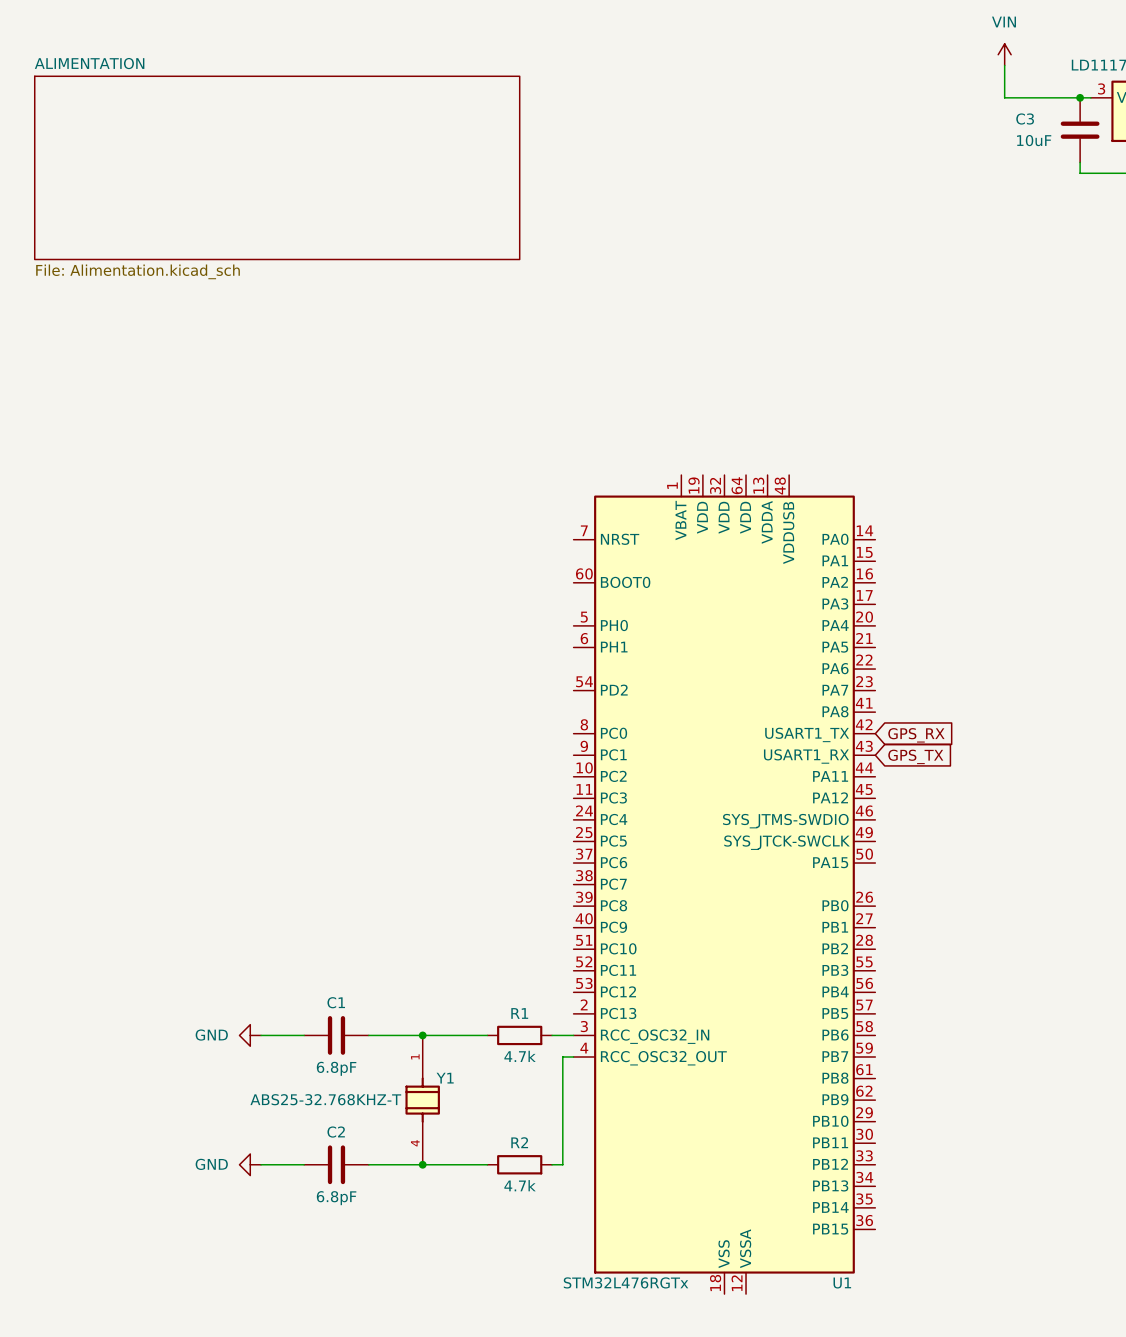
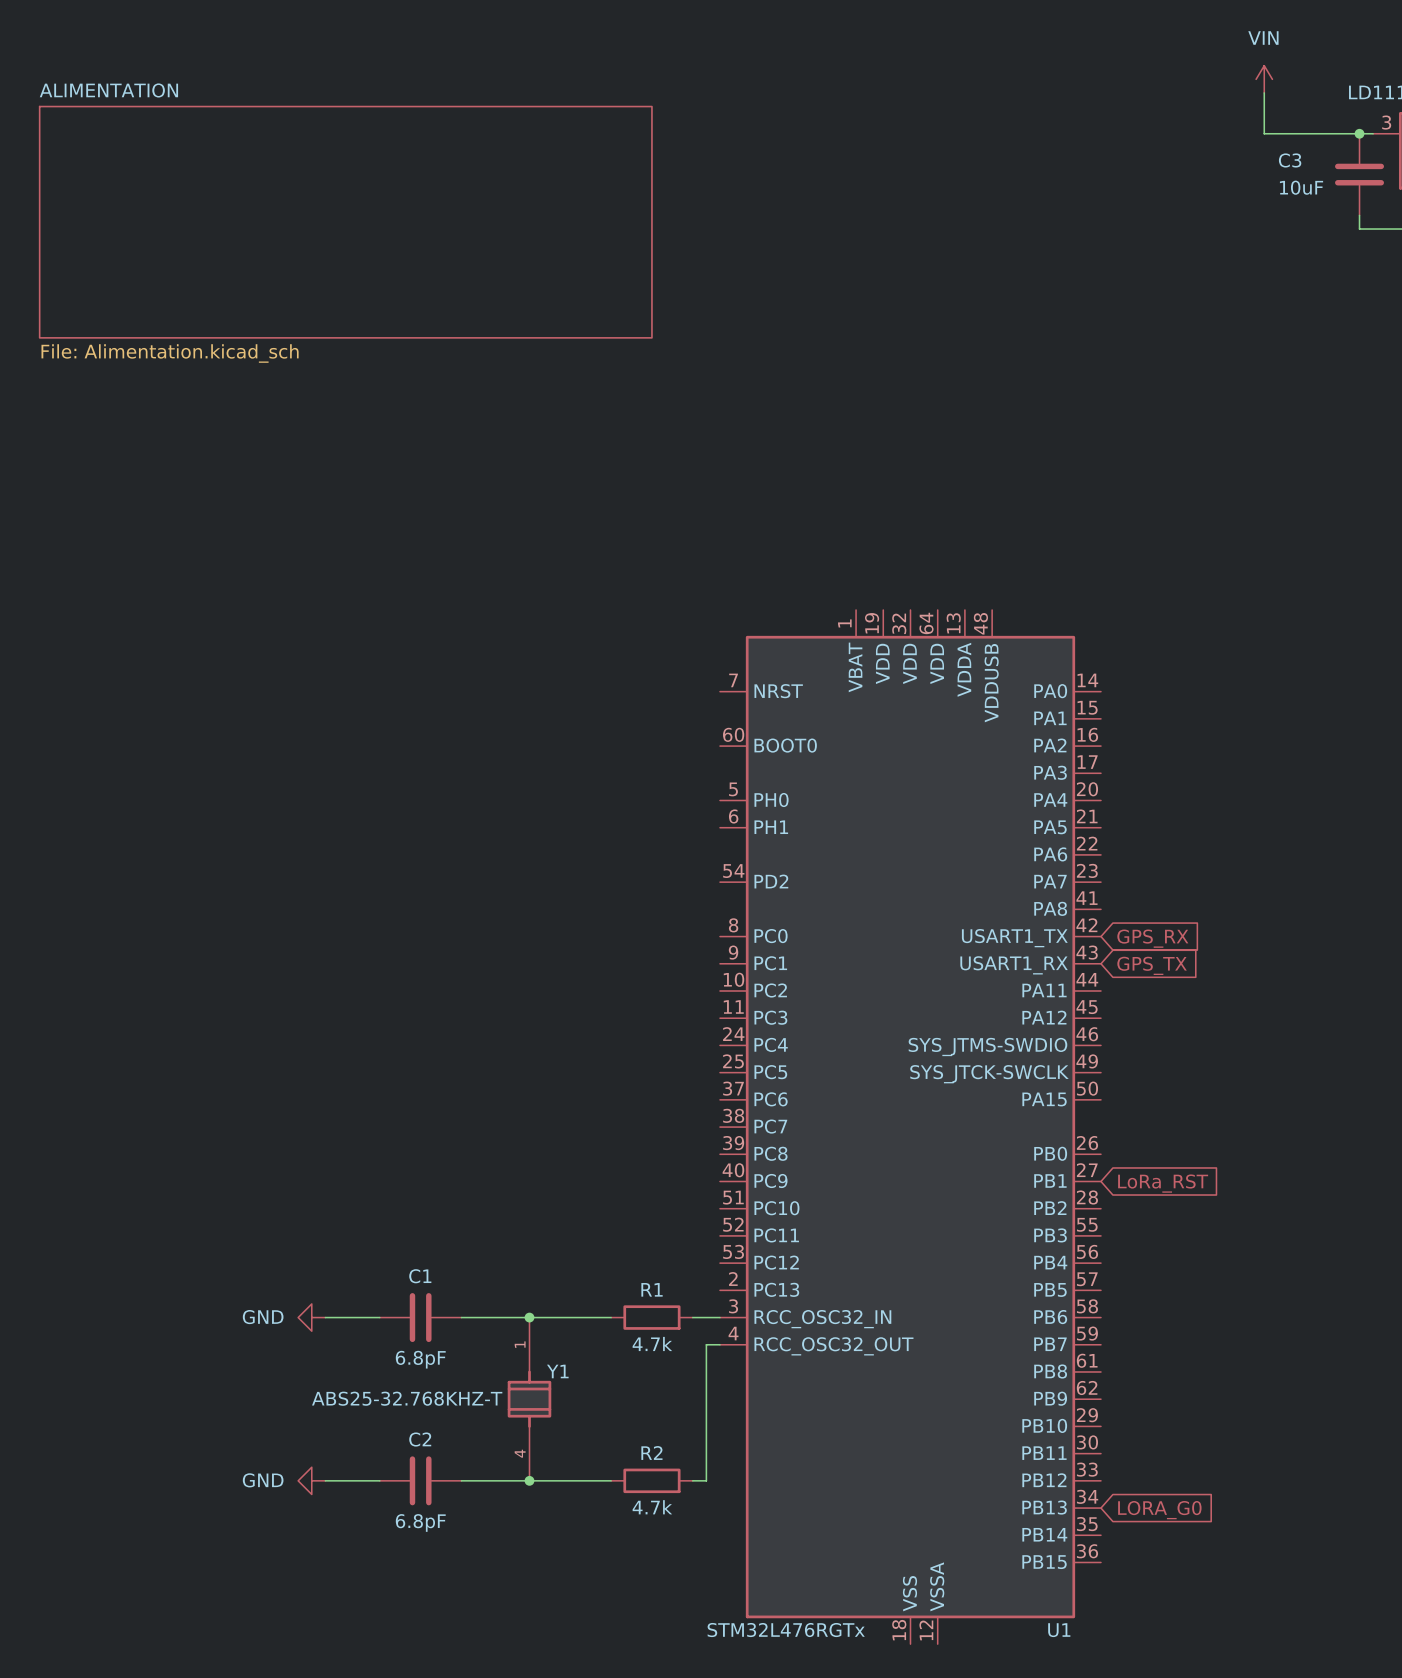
global label: none -> LoRa_RST (1163, 1183)
global label: none -> LORA_G0 (1159, 1510)

